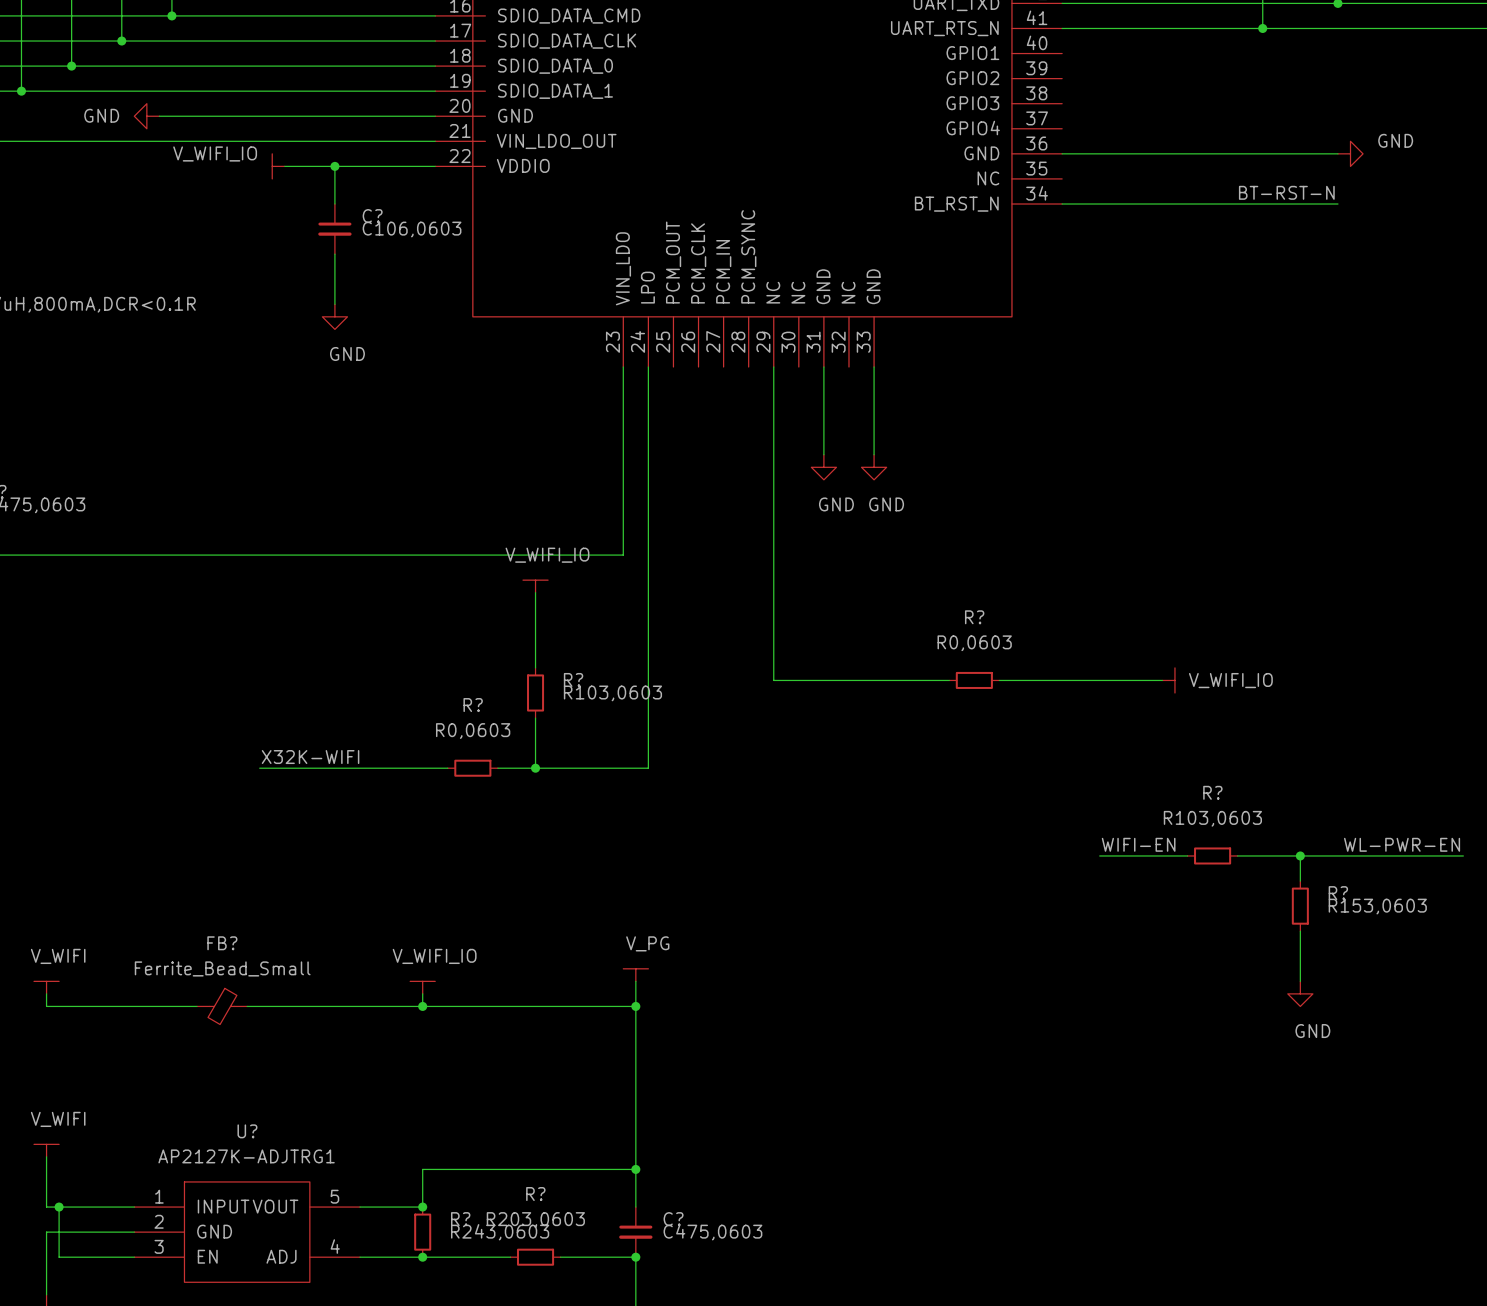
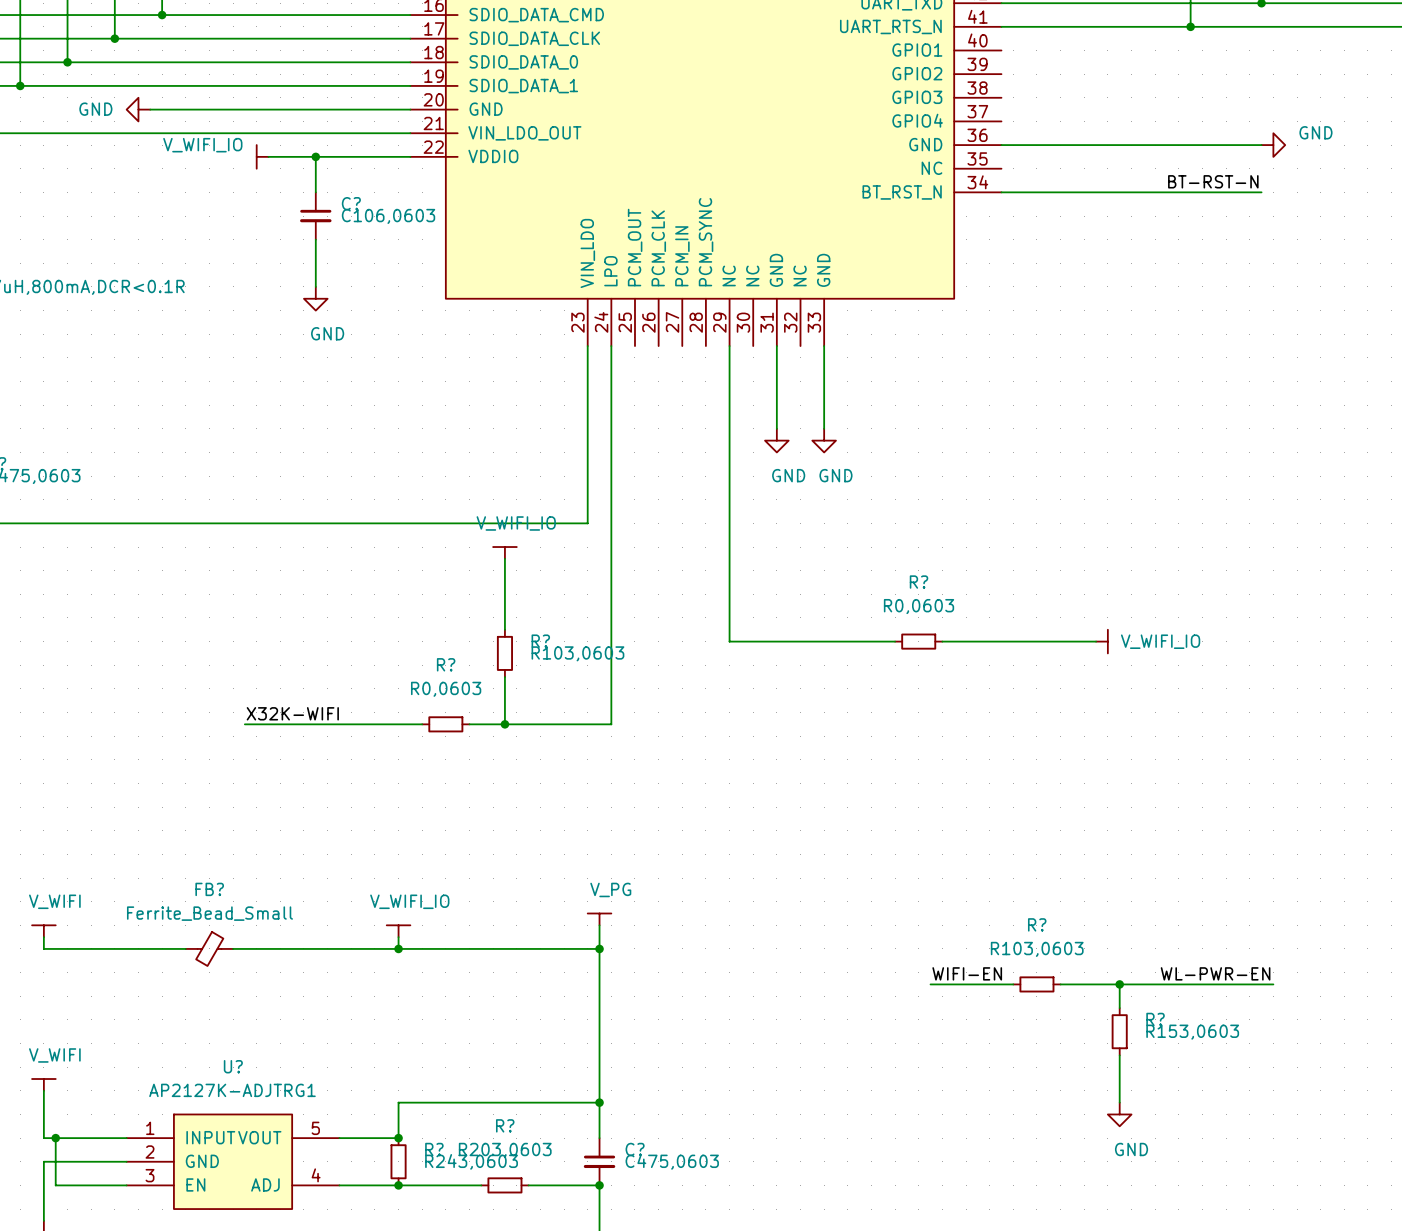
label position: WIFI-EN (1138, 844) -> WIFI-EN (967, 973)
label position: WL-PWR-EN (1402, 844) -> WL-PWR-EN (1215, 973)
wire: (1099, 855) (1187, 855) -> (930, 984) (1013, 984)
R? position: (1212, 855) -> (1036, 984)
wire: (1237, 855) (1463, 855) -> (1060, 984) (1273, 984)
wire: (1300, 855) (1300, 881) -> (1119, 984) (1119, 1008)
junction: (1300, 855) -> none
R? position: (1300, 906) -> (1119, 1031)
wire: (1300, 931) (1300, 981) -> (1119, 1055) (1119, 1102)
power symbol position: GND (1300, 993) -> GND (1119, 1114)
junction: none -> (1119, 984)

